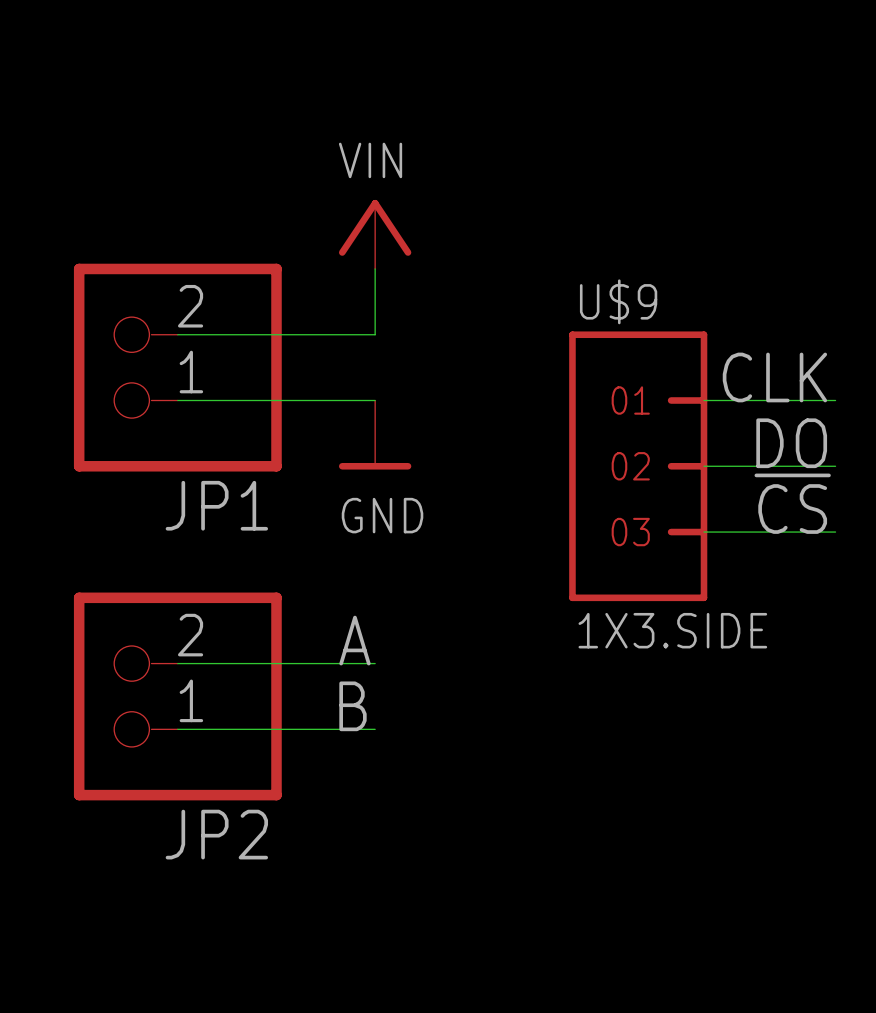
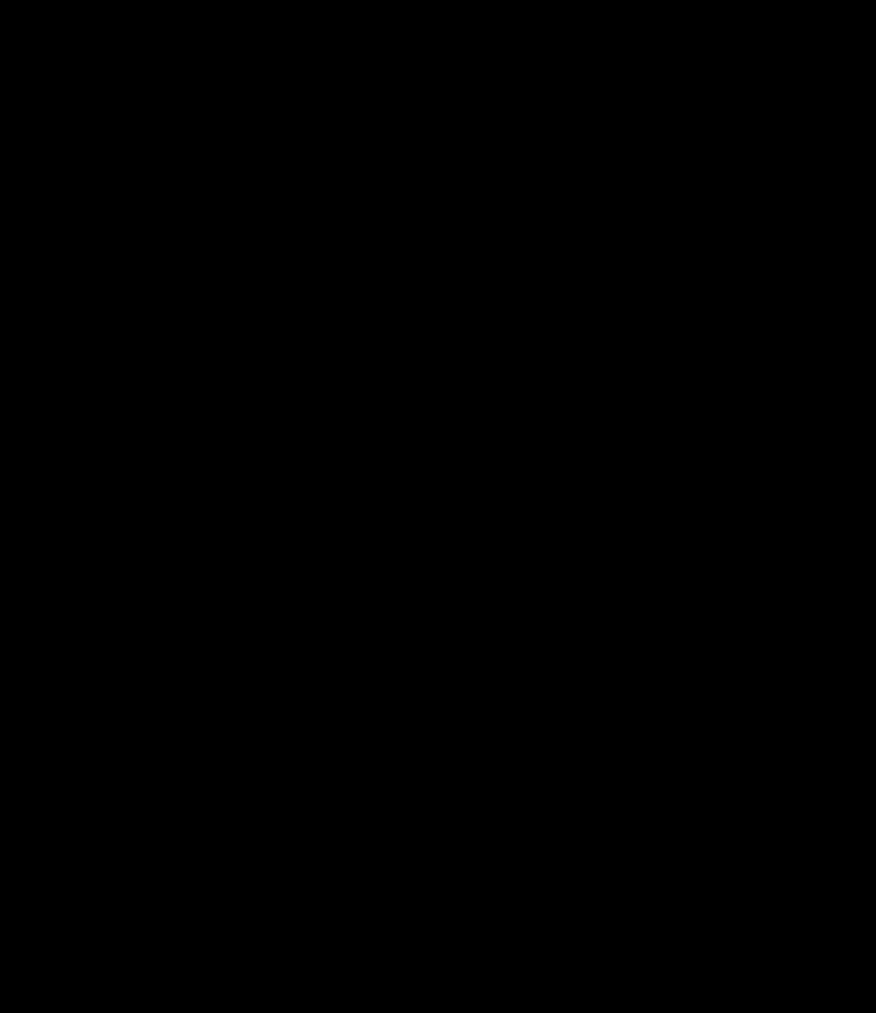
power symbol: VIN (375, 234) -> none
wire: (375, 268) (375, 334) (177, 334) -> none
JP1: (177, 367) -> none
label: CLK (774, 377) -> none
wire: (177, 400) (375, 400) -> none
wire: (704, 400) (835, 400) -> none
power symbol: GND (375, 435) -> none
label: DO (791, 443) -> none
U$9: 1X3.SIDE (638, 466) -> none
wire: (704, 466) (835, 466) -> none
label: ~{CS} (792, 503) -> none
wire: (704, 532) (835, 532) -> none
label: A (354, 640) -> none
wire: (177, 663) (375, 663) -> none
JP2: (177, 696) -> none
label: B (352, 706) -> none
wire: (177, 729) (375, 729) -> none

